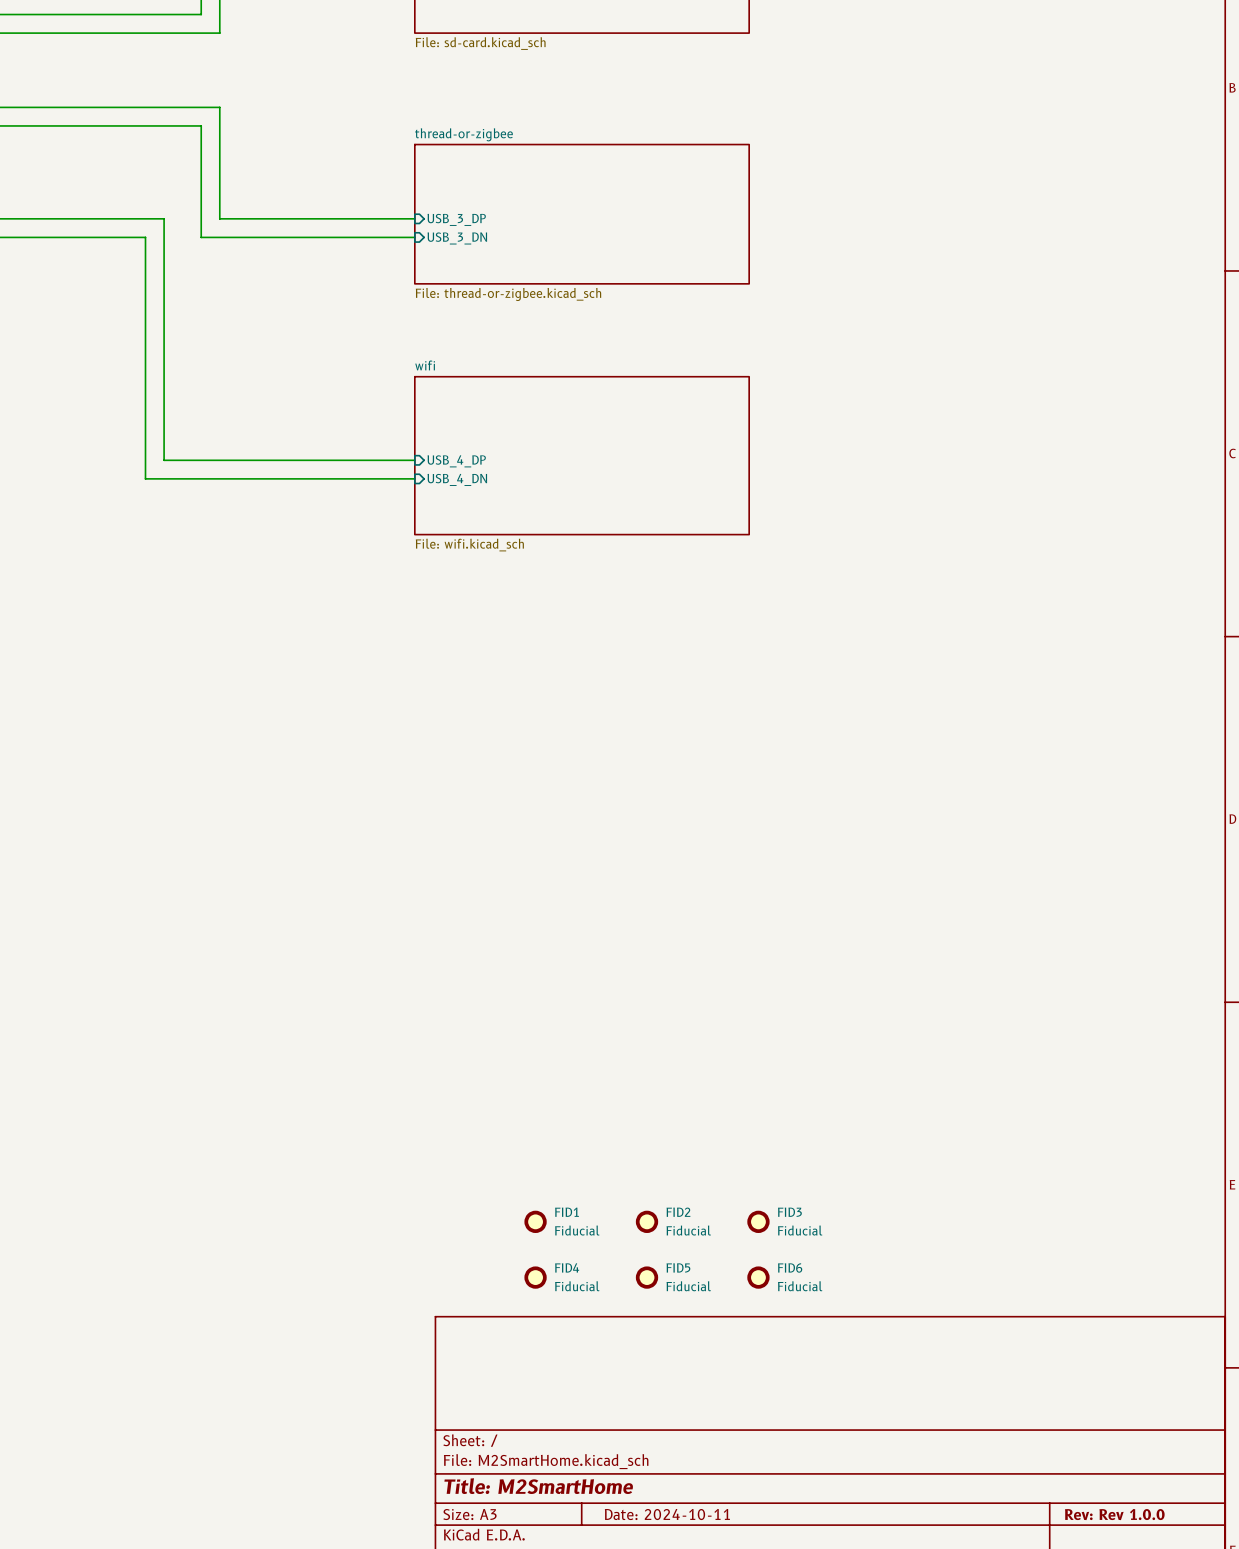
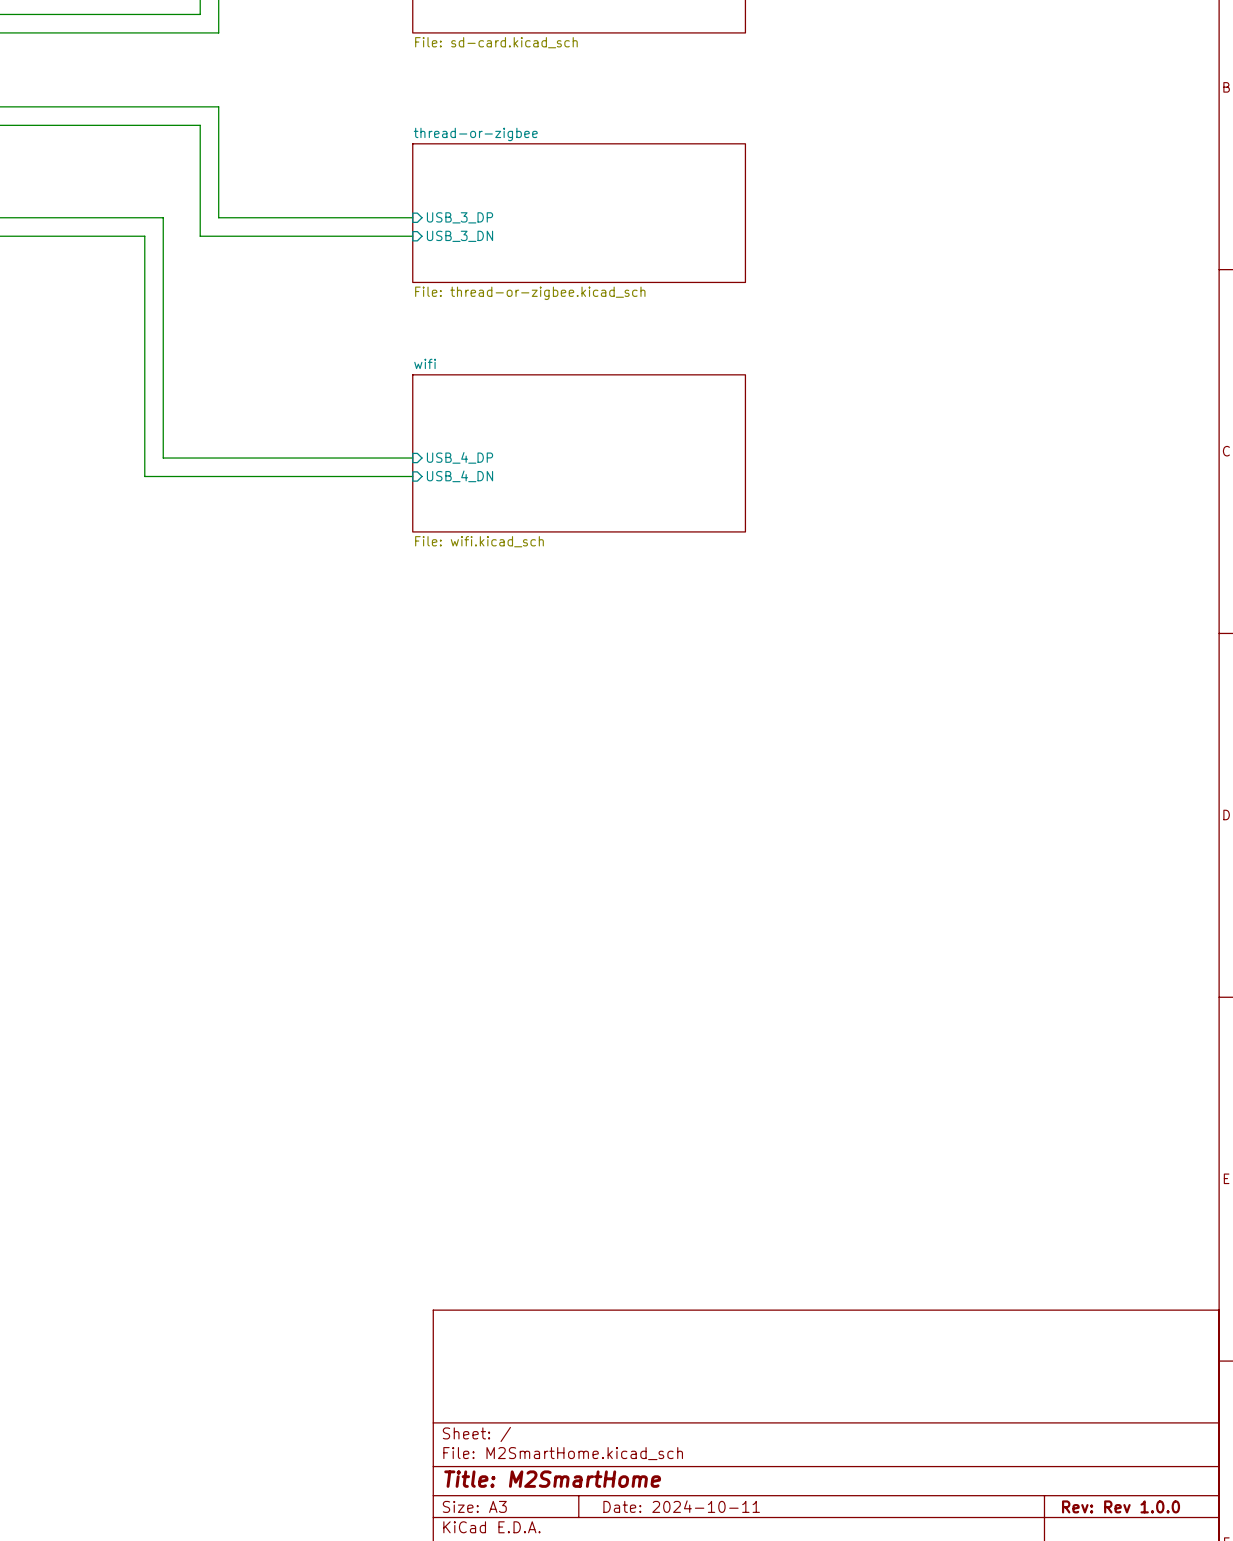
FID1: Fiducial (535, 1221) -> none
FID2: Fiducial (647, 1221) -> none
FID3: Fiducial (758, 1221) -> none
FID4: Fiducial (535, 1277) -> none
FID5: Fiducial (647, 1277) -> none
FID6: Fiducial (758, 1277) -> none

